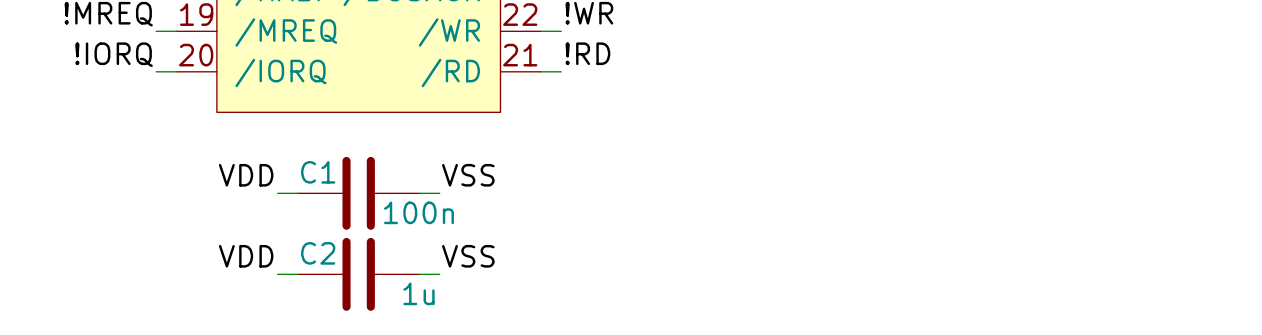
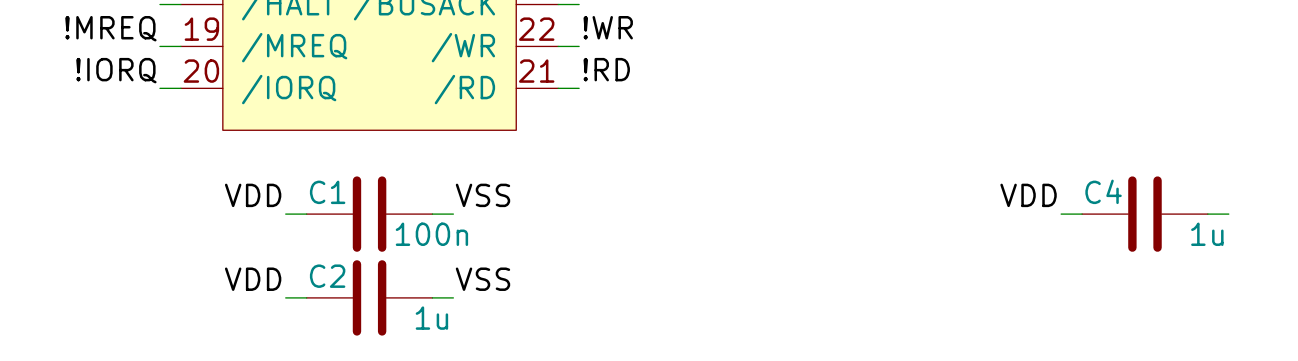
label: none -> VDD (1028, 195)
wire: none -> (1061, 214) (1082, 214)
C4: none -> 1u (1144, 214)
wire: none -> (1207, 214) (1228, 214)

